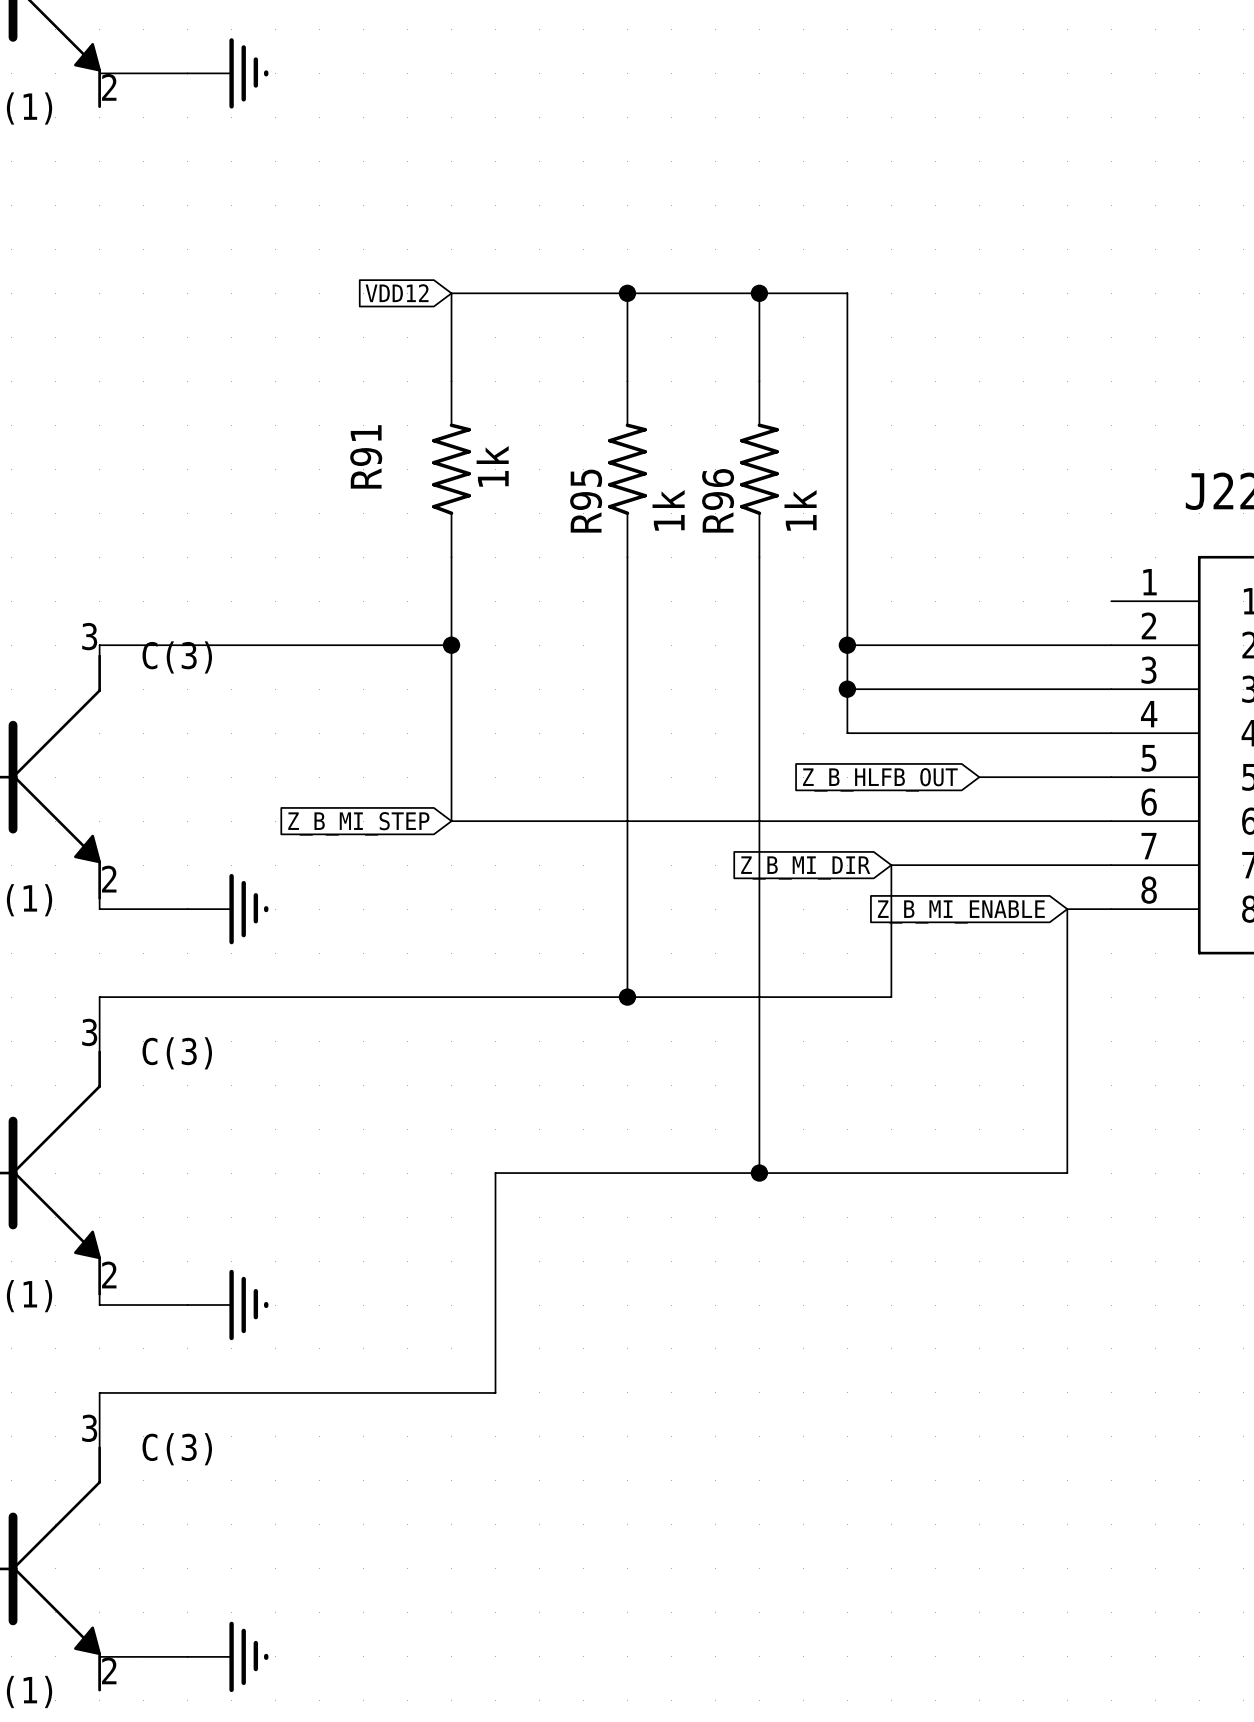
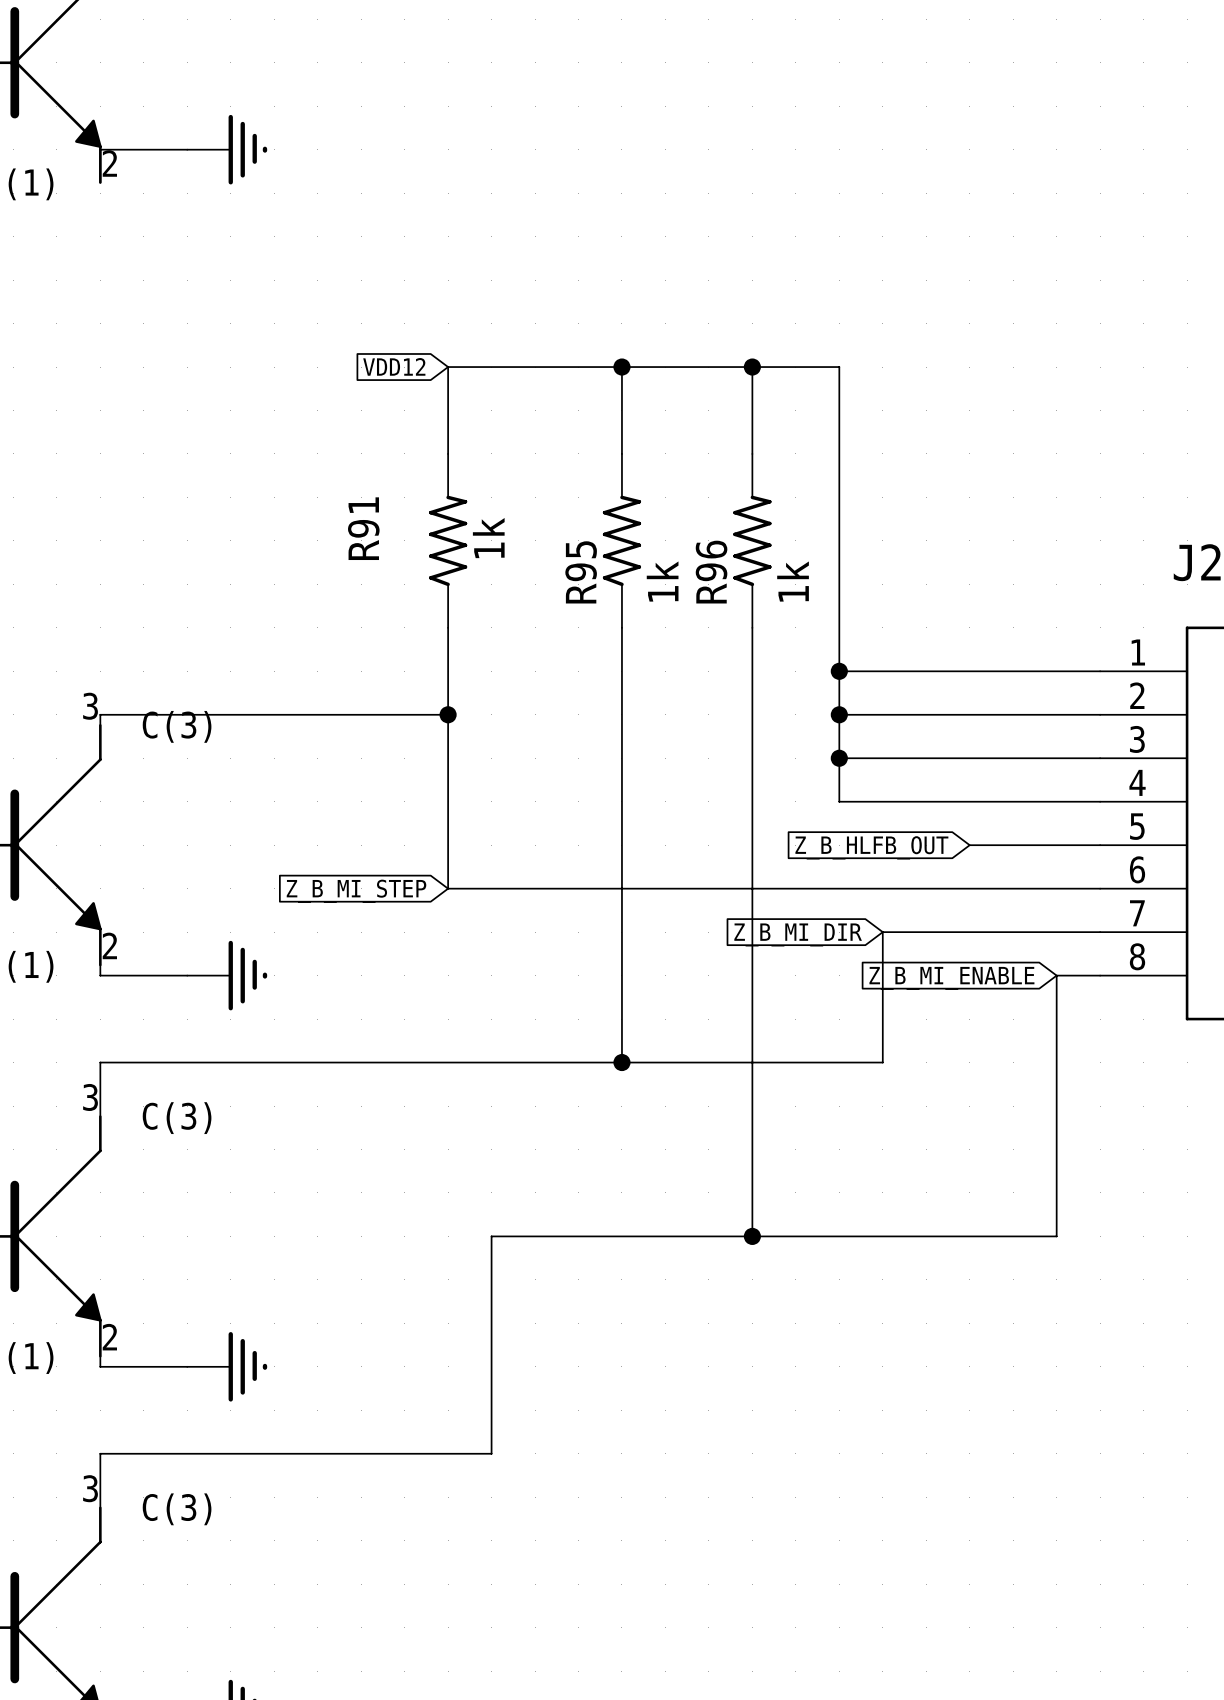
wire: none -> (839, 671) (1100, 671)
junction: none -> (839, 671)

